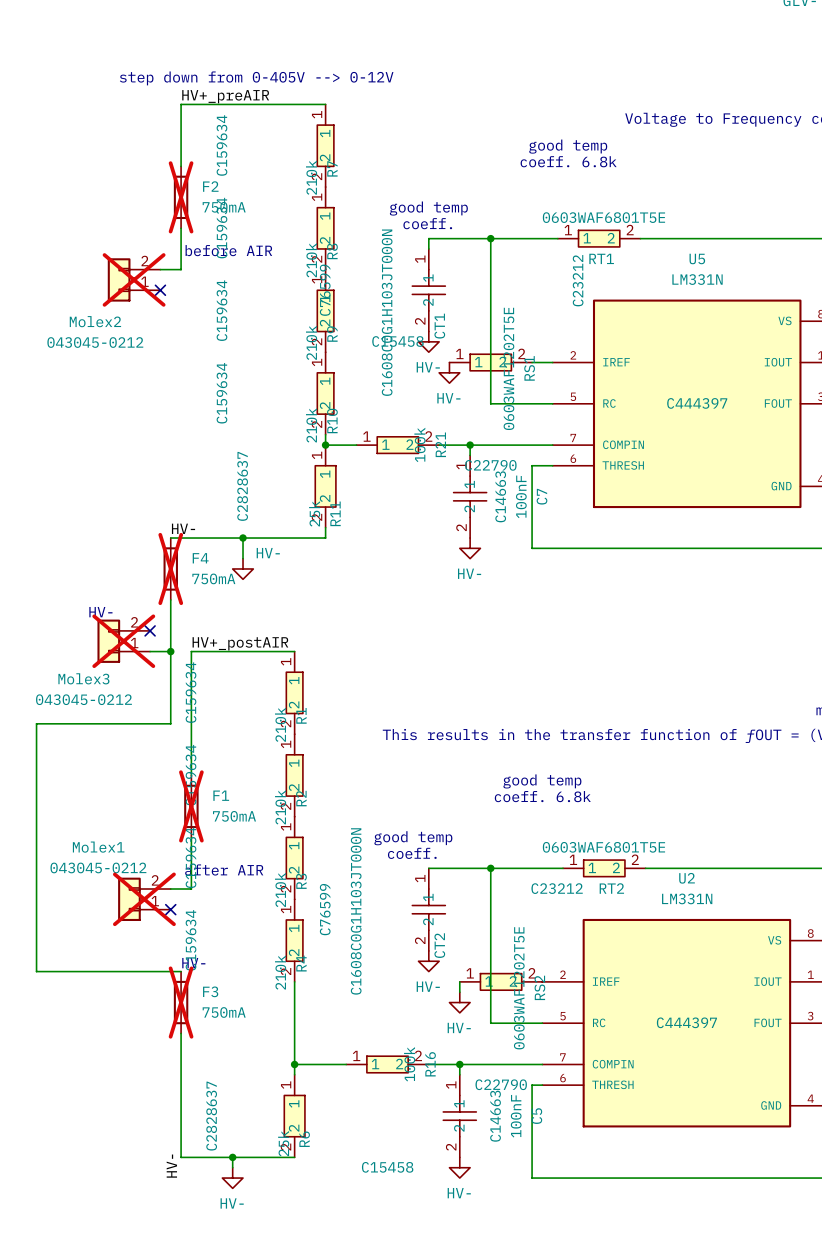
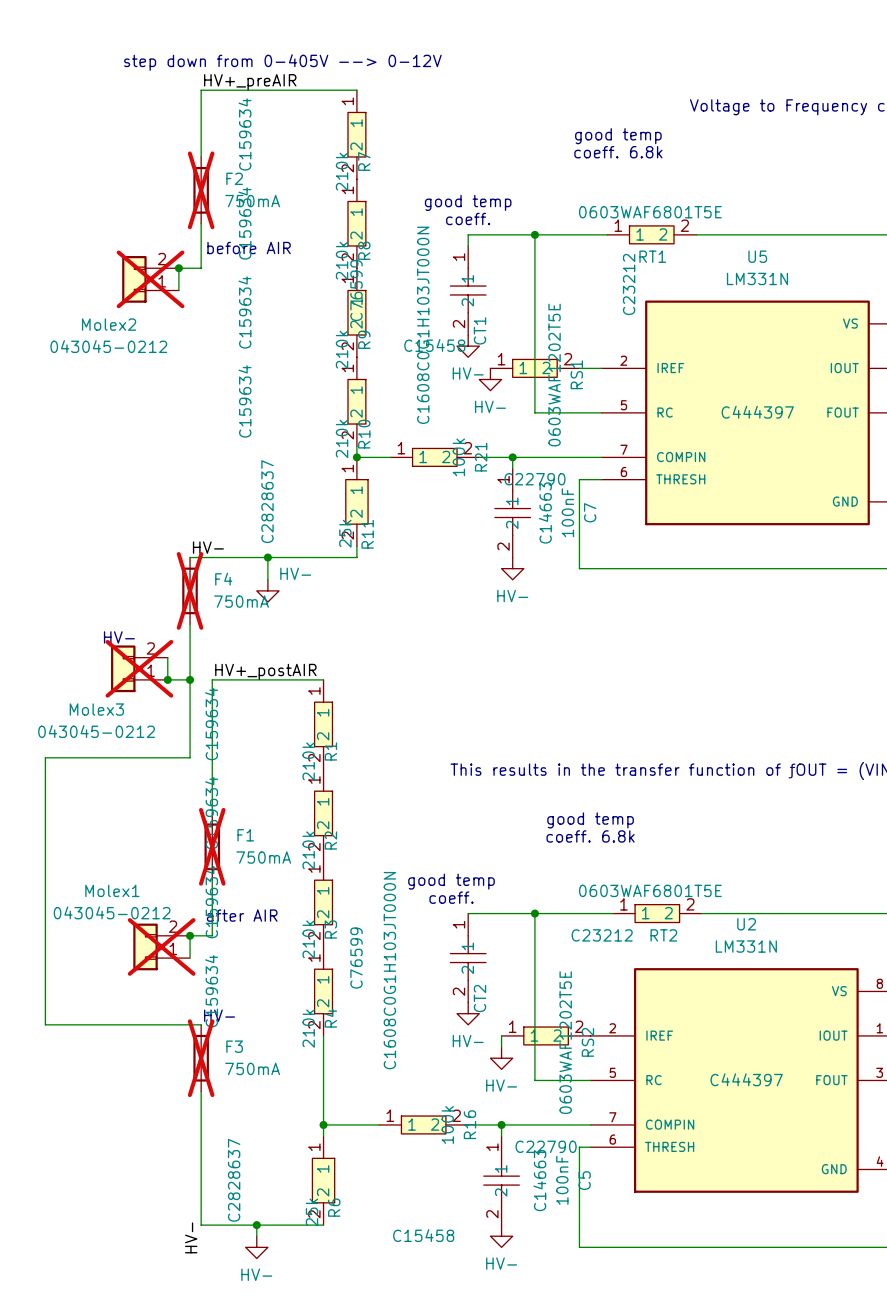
wire: none -> (178, 268) (178, 290)
junction: none -> (178, 268)
no-connect mark: (160, 290) -> none
wire: none -> (167, 657) (167, 679)
no-connect mark: (150, 630) -> none
junction: none -> (167, 679)
wire: none -> (190, 935) (190, 958)
junction: none -> (190, 935)
no-connect mark: (170, 909) -> none

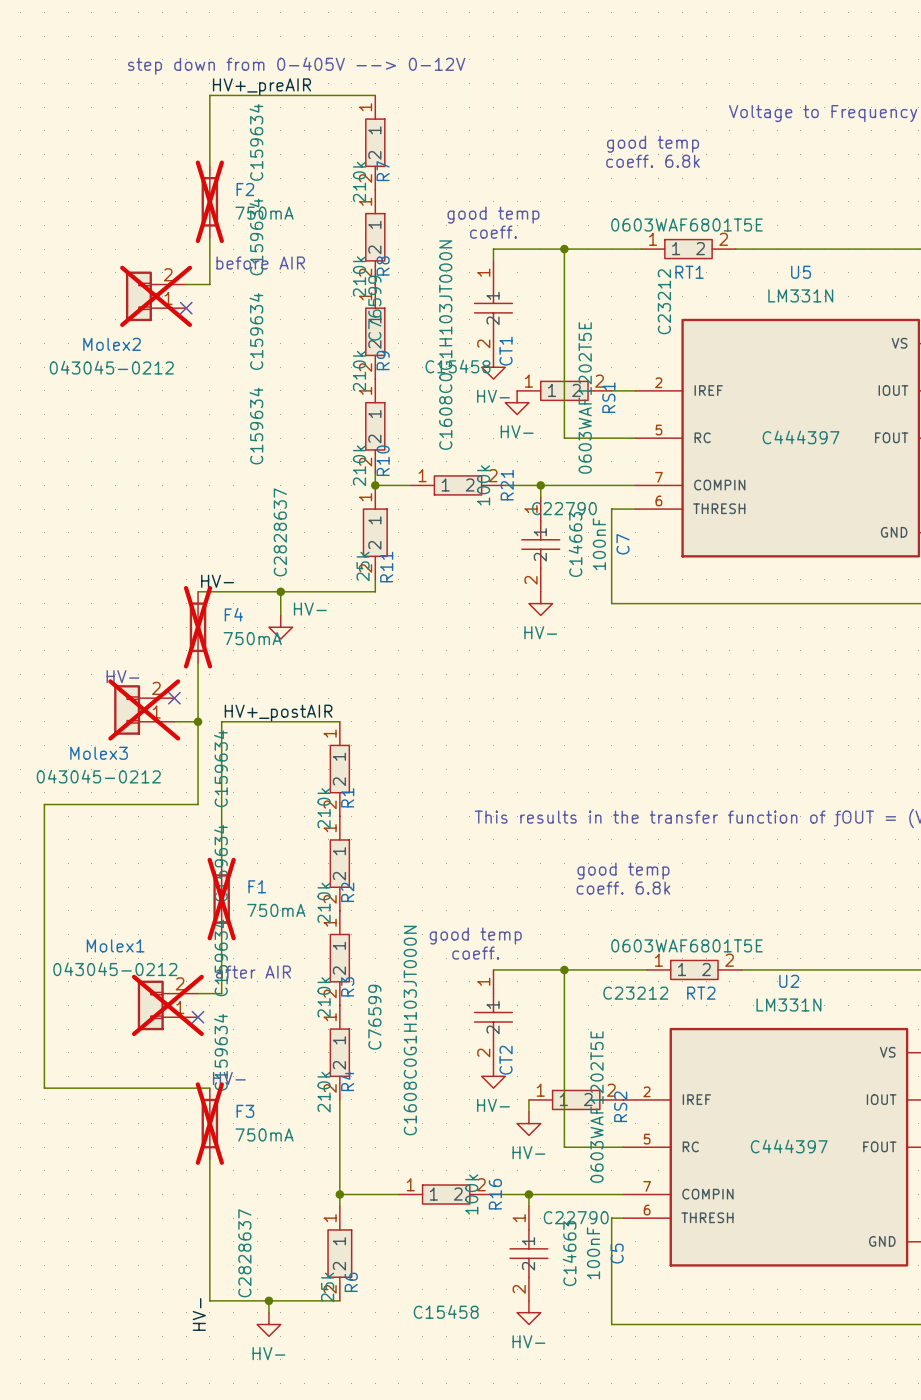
wire: (178, 268) (178, 290) -> none
junction: (178, 268) -> none
no-connect mark: none -> (186, 308)
wire: (167, 657) (167, 679) -> none
no-connect mark: none -> (174, 698)
junction: (167, 679) -> none
wire: (190, 935) (190, 958) -> none
junction: (190, 935) -> none
no-connect mark: none -> (198, 1017)

